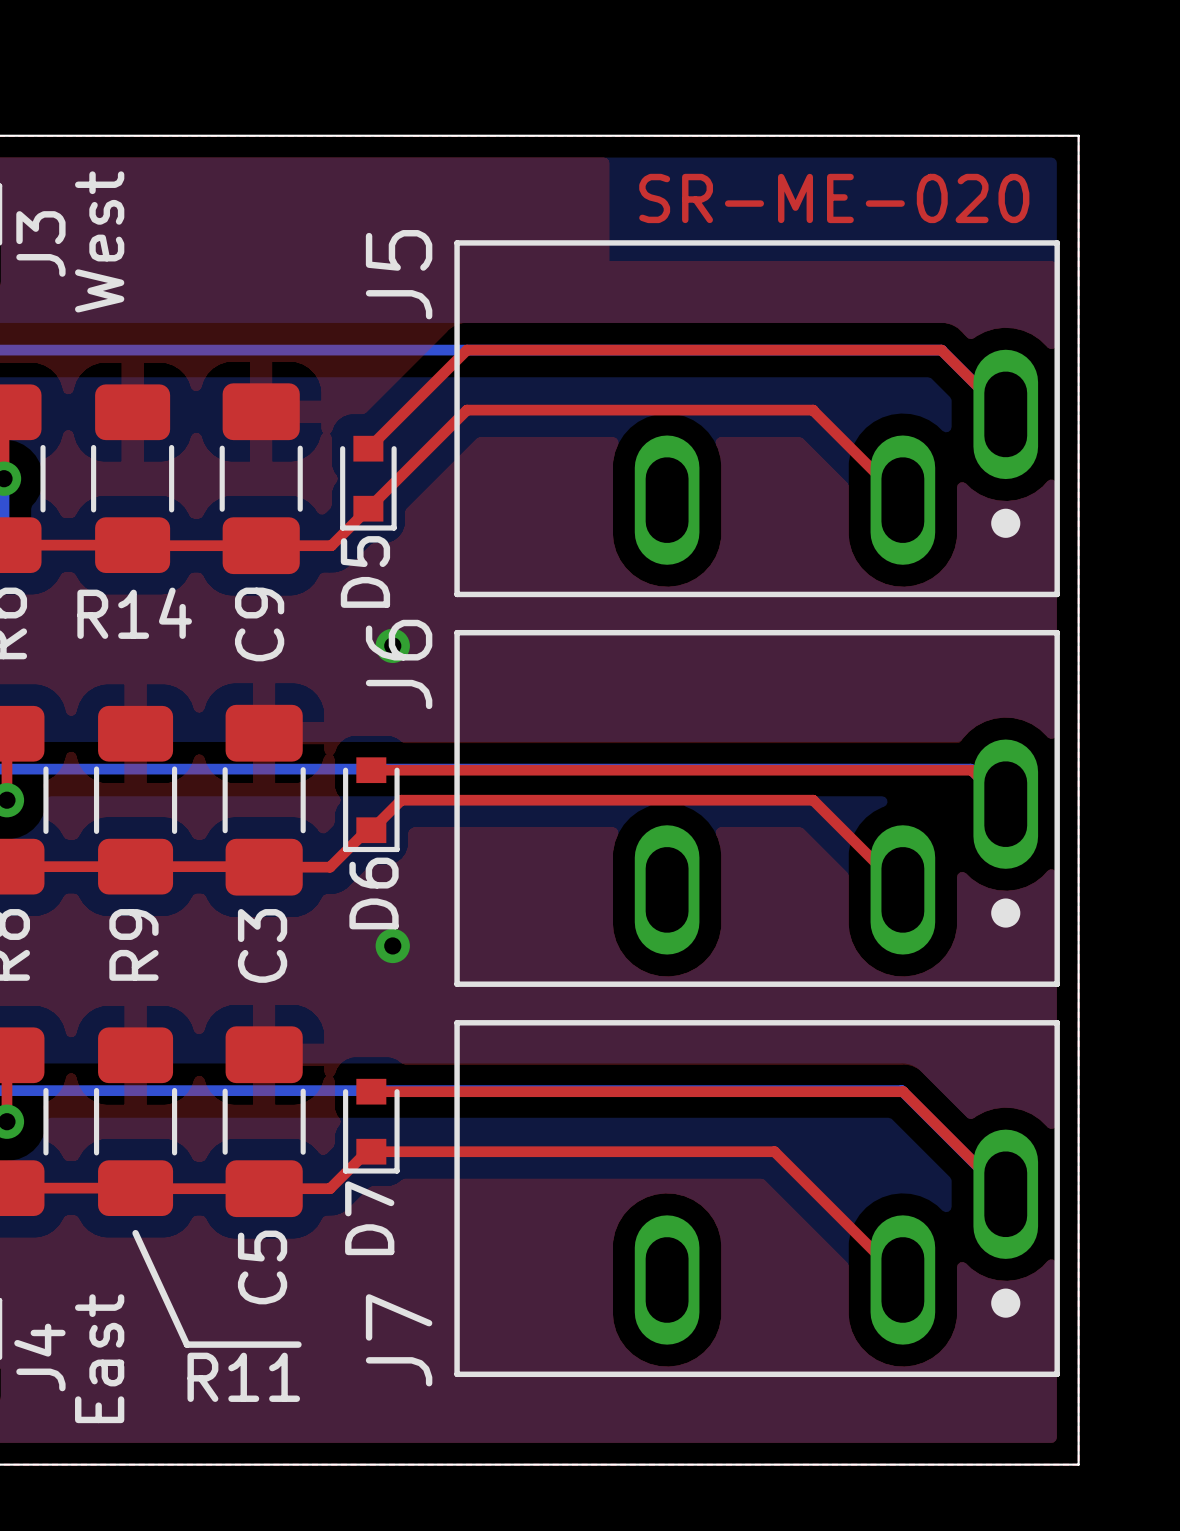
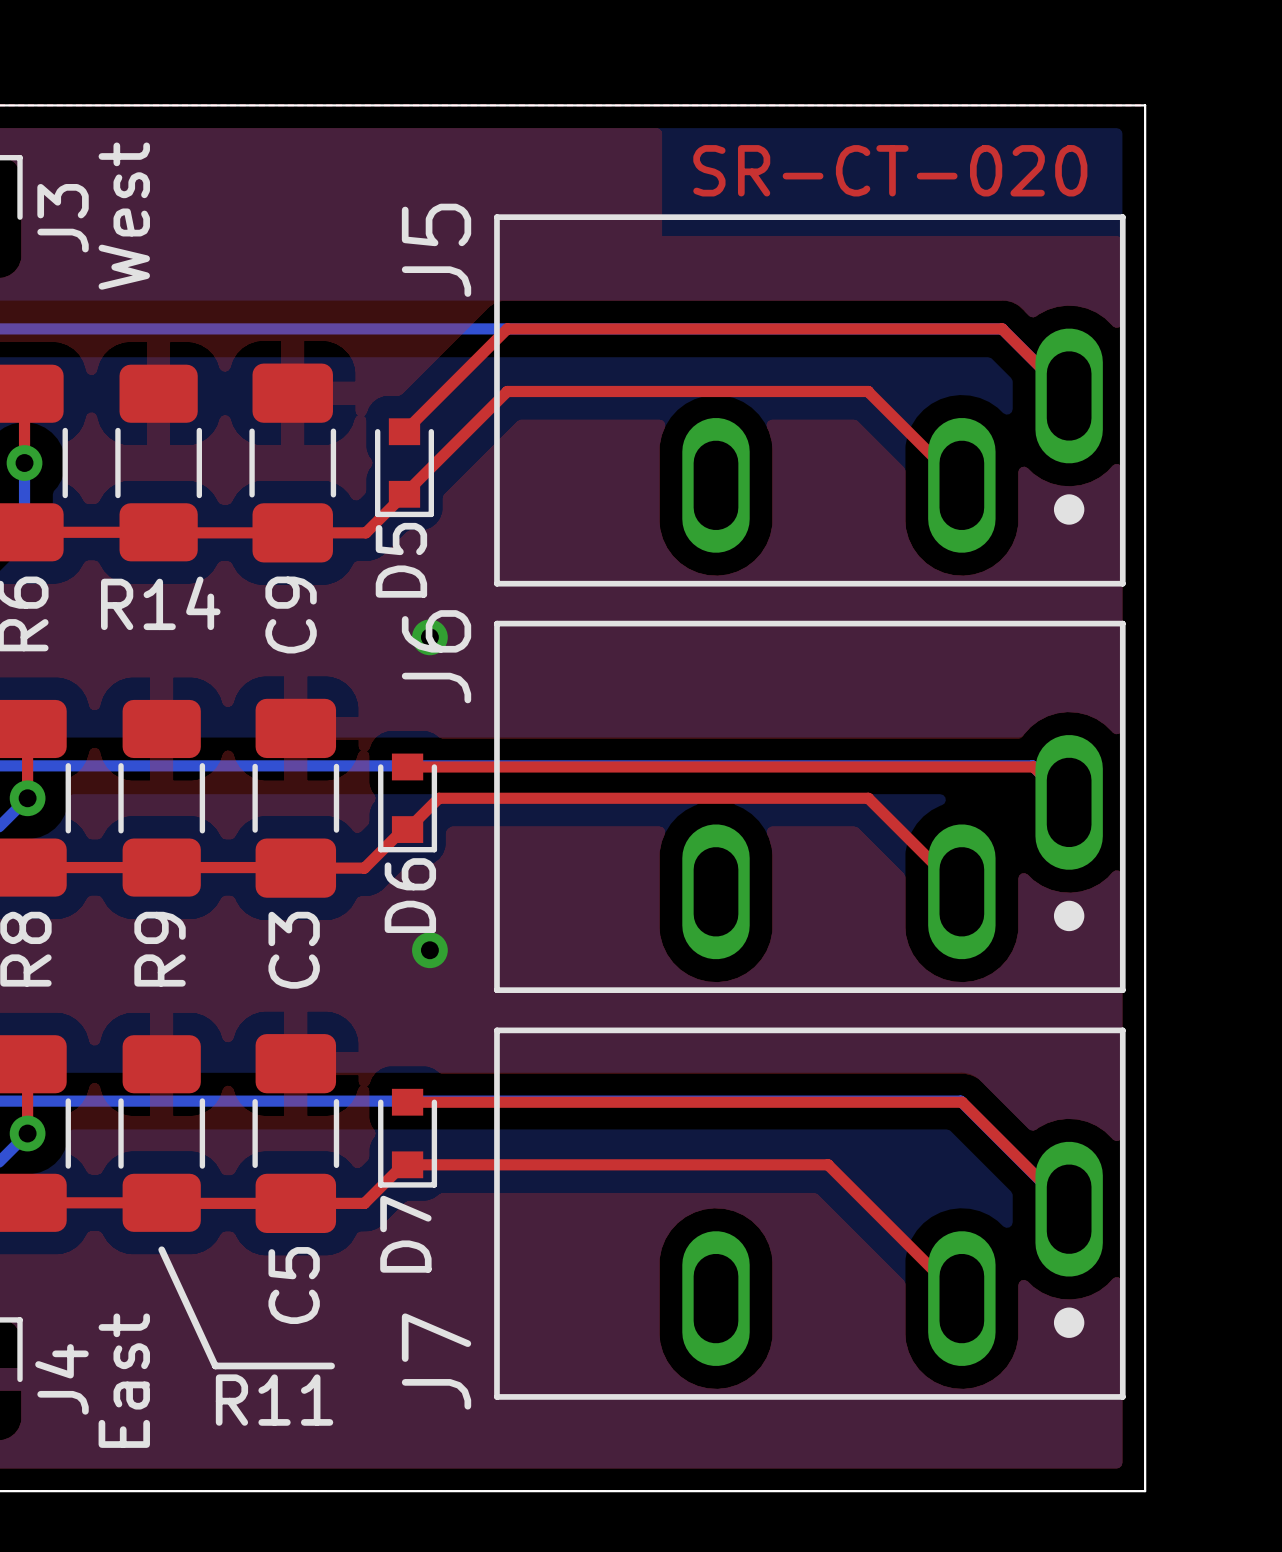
text: SR-ME-020 (834, 198) -> SR-CT-020 (890, 170)

